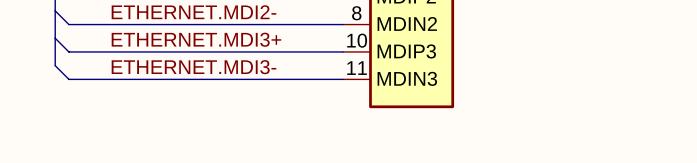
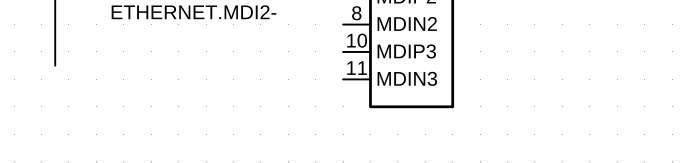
wire: (55, 10) (68, 24) (343, 24) -> none
wire: (55, 38) (68, 51) (343, 51) -> none
label: ETHERNET.MDI3+ (196, 39) -> none
wire: (55, 65) (68, 79) (343, 79) -> none
label: ETHERNET.MDI3- (193, 67) -> none

